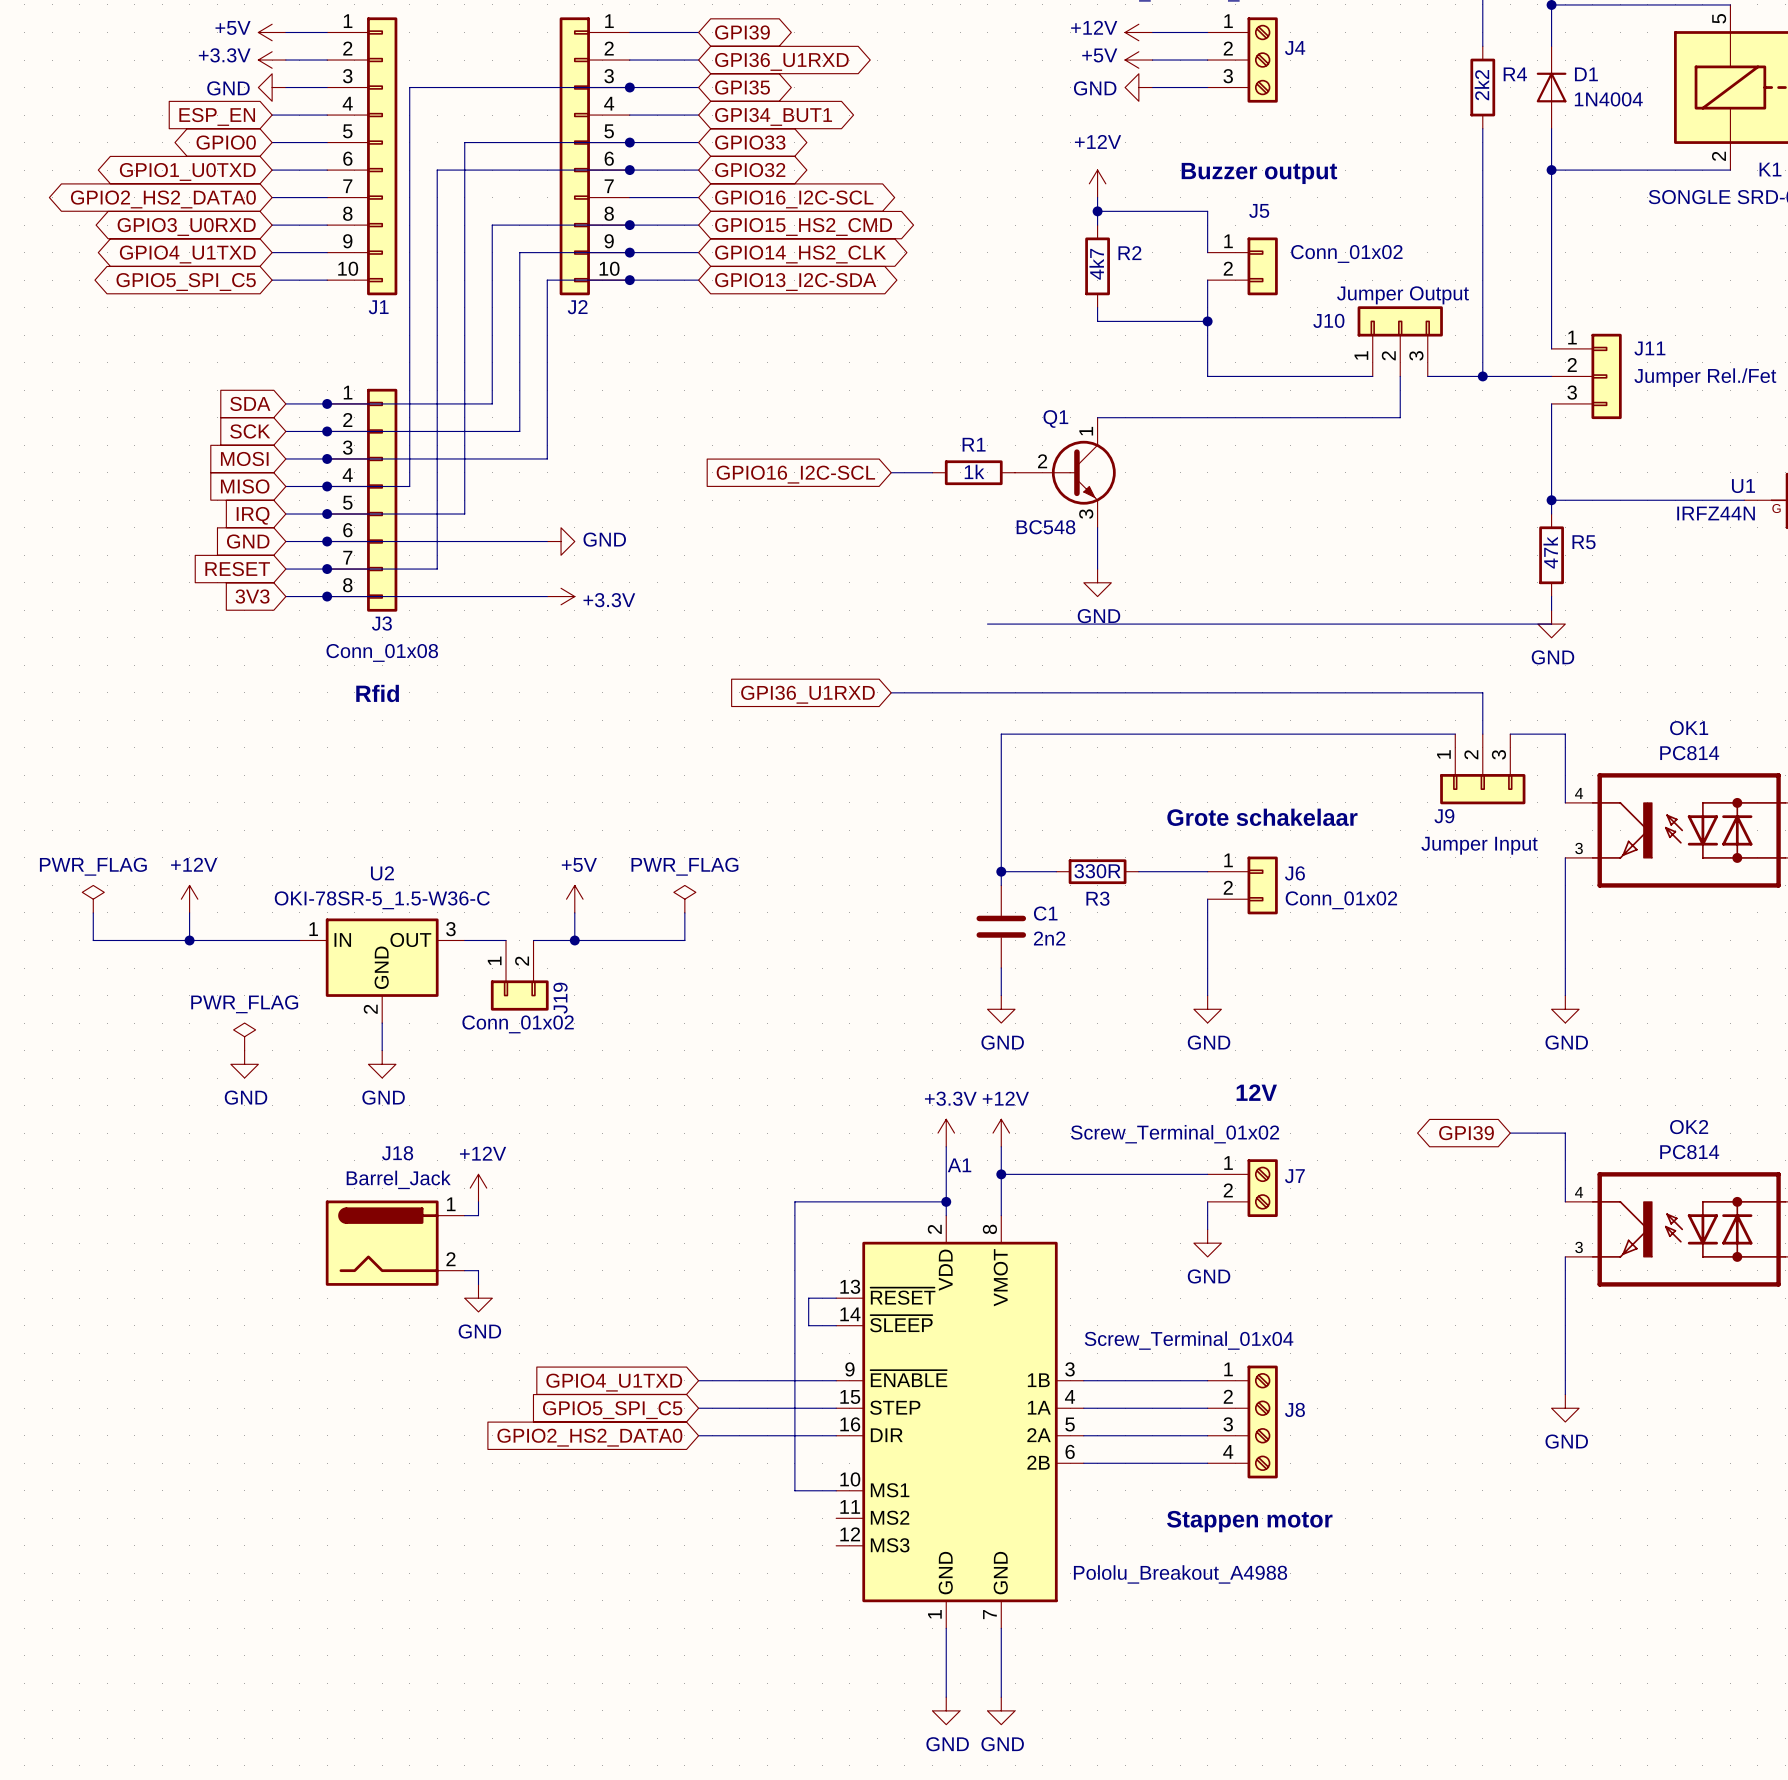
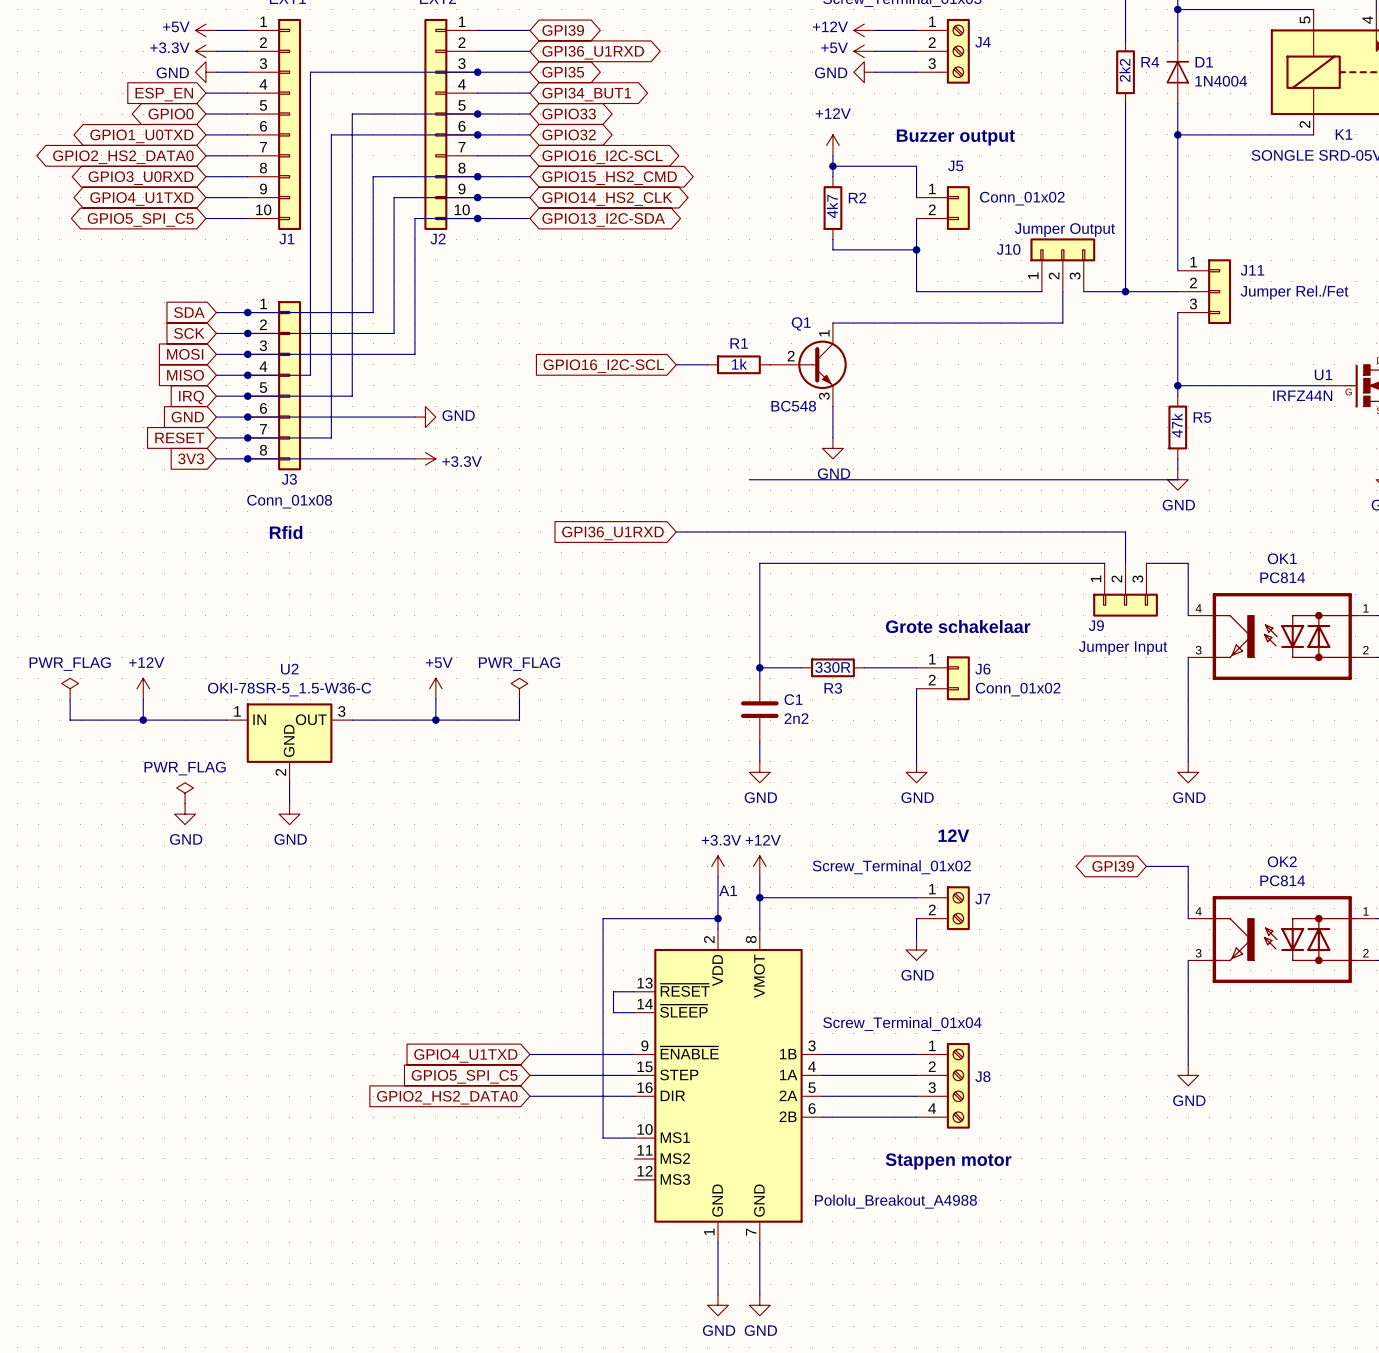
wire: none -> (383, 720) (404, 720)
J19: Conn_01x02 (519, 975) -> none
power symbol: +12V (478, 1188) -> none
wire: (478, 1201) (478, 1215) (464, 1215) -> none
J18: Barrel_Jack (395, 1243) -> none
wire: (464, 1270) (478, 1270) (478, 1284) -> none
power symbol: GND (478, 1298) -> none

